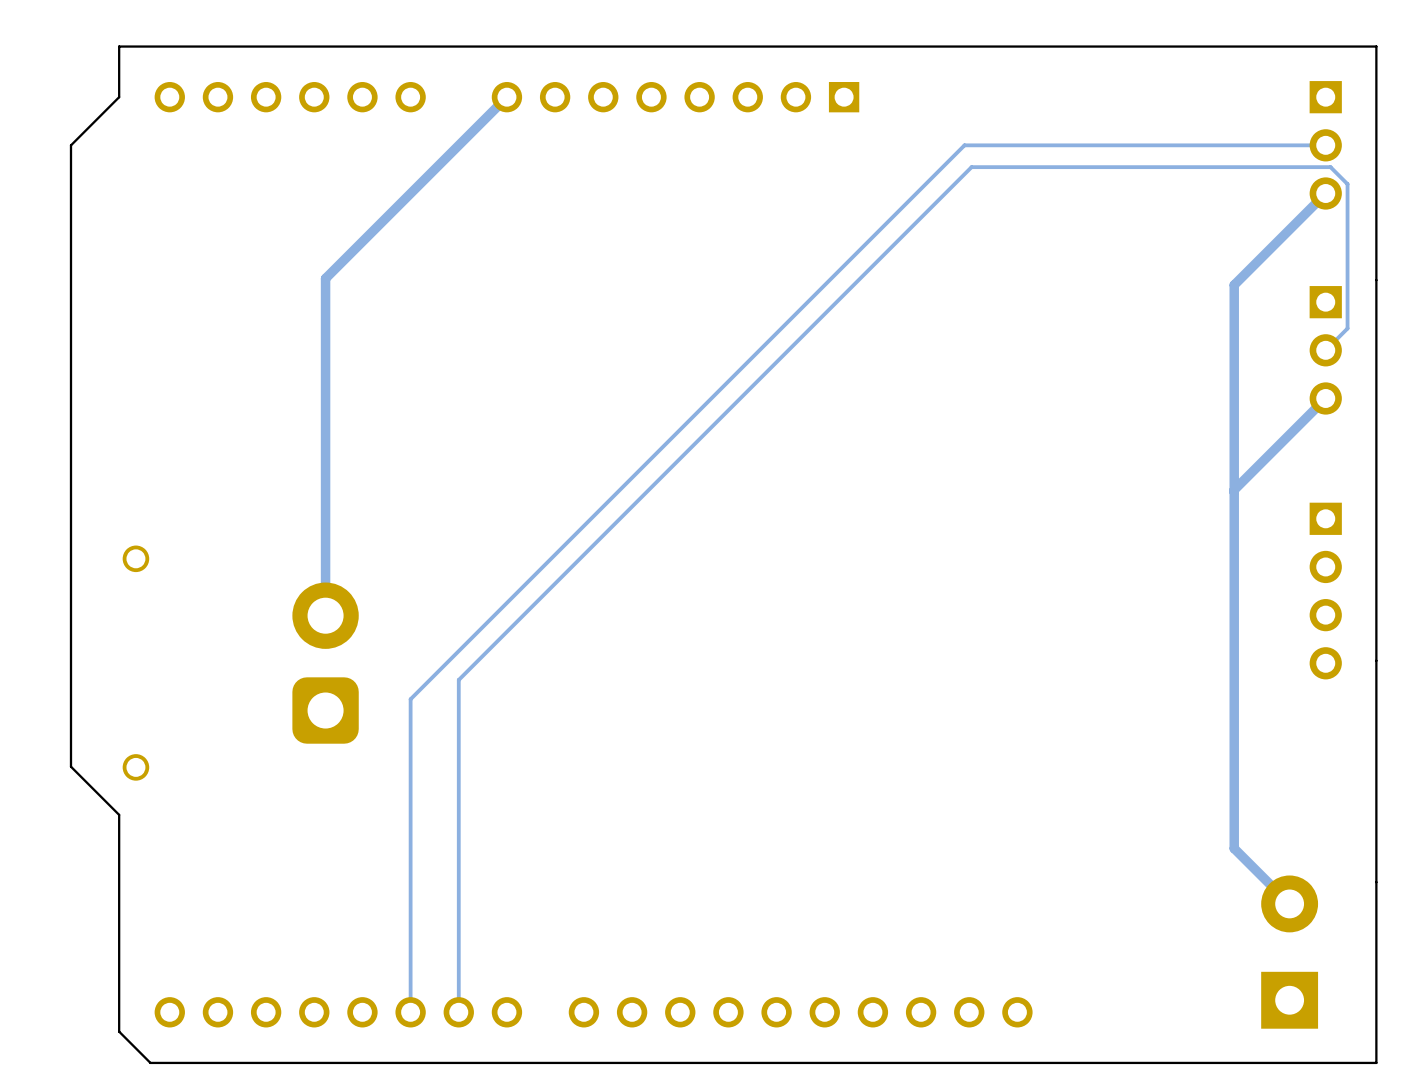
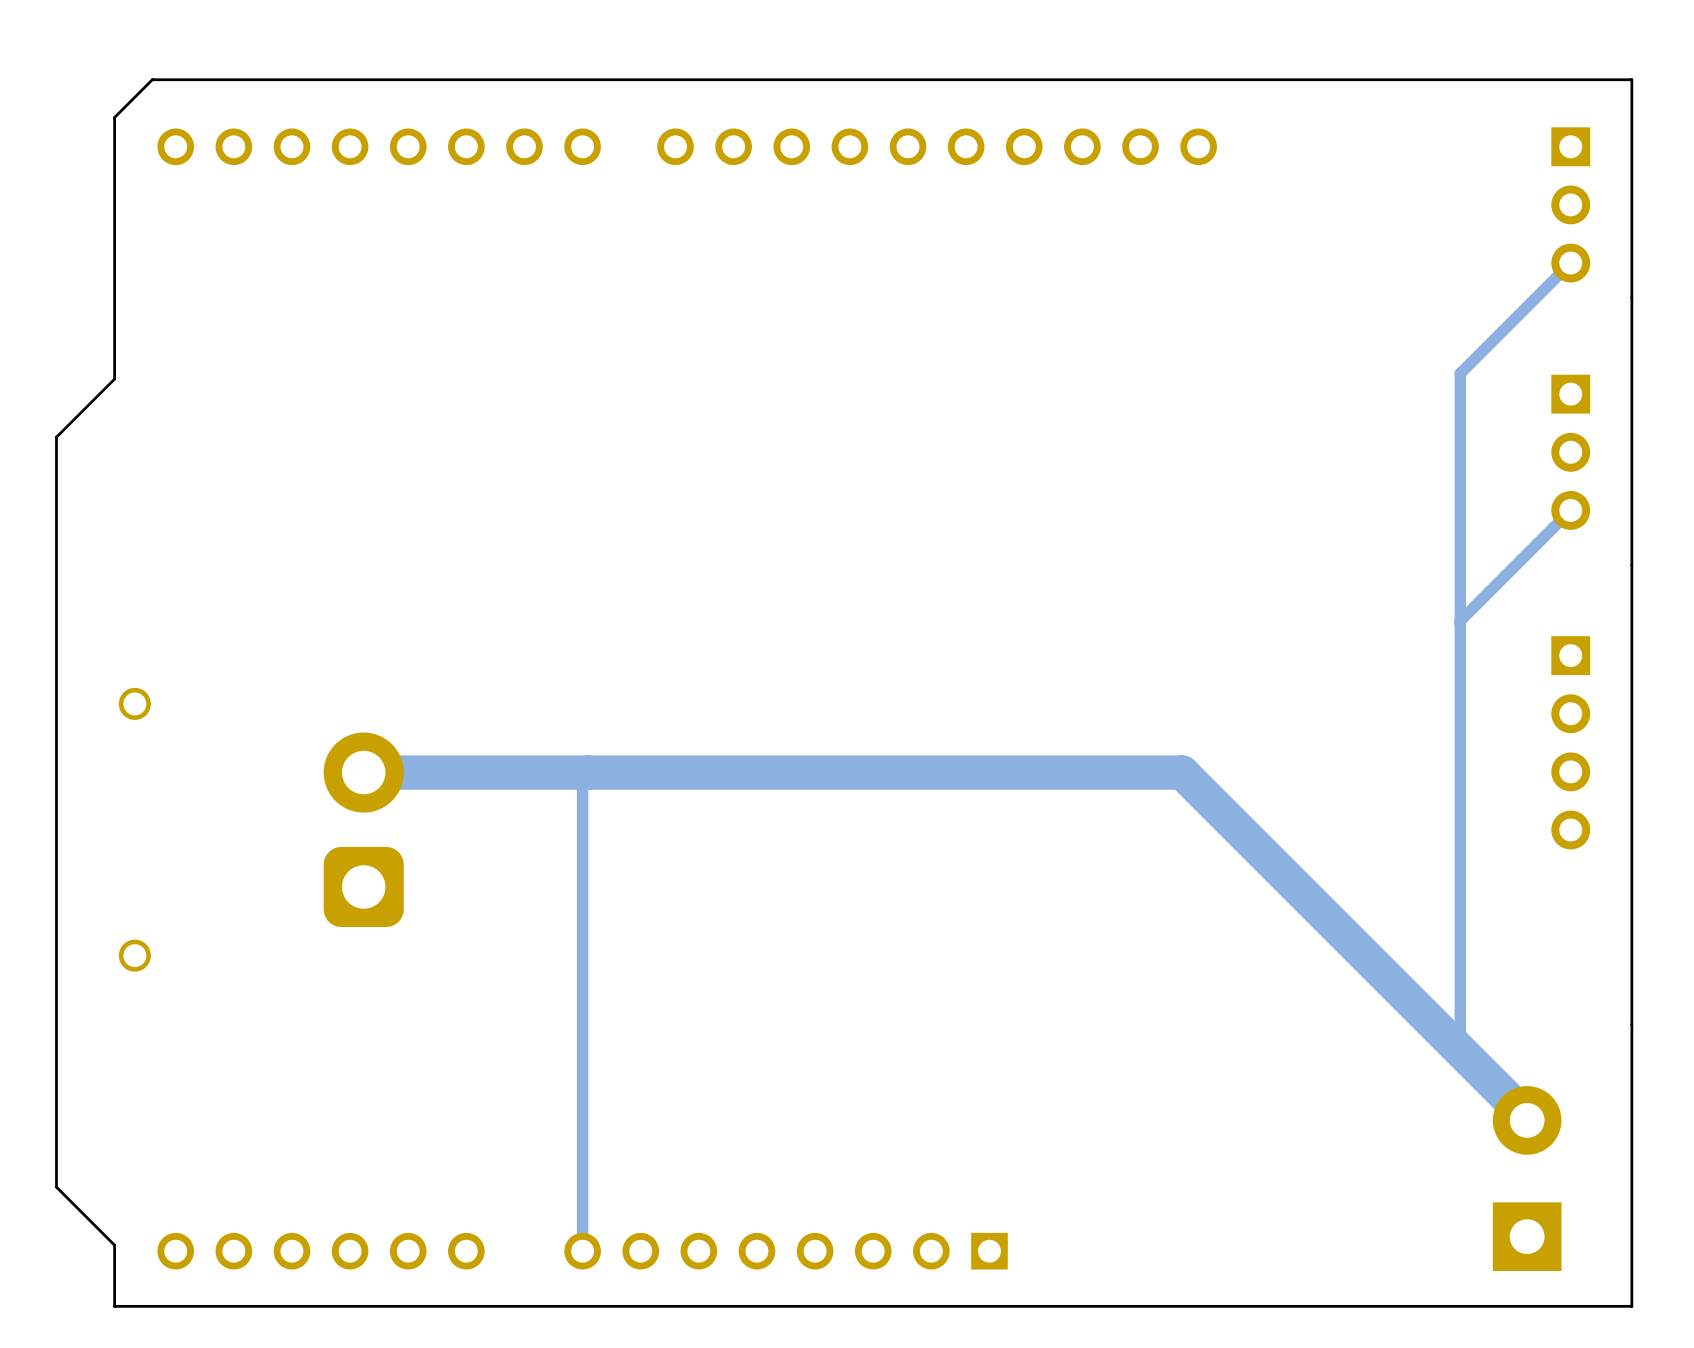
part footprint: [69, 45, 1378, 1065] -> [55, 78, 1634, 1308]
track: (506, 97) (325, 278) (325, 615) -> none
track: (1325, 145) (964, 145) (410, 699) (410, 1012) -> none
track: (1325, 350) (1347, 328) (1347, 184) (1330, 167) (971, 167) (458, 679) (458, 1012) -> none
track: none -> (588, 772) (582, 778) (582, 1251)
track: (1234, 846) (1234, 848) (1289, 903) -> (1460, 1050) (1530, 1120) (1182, 772) (363, 772)

